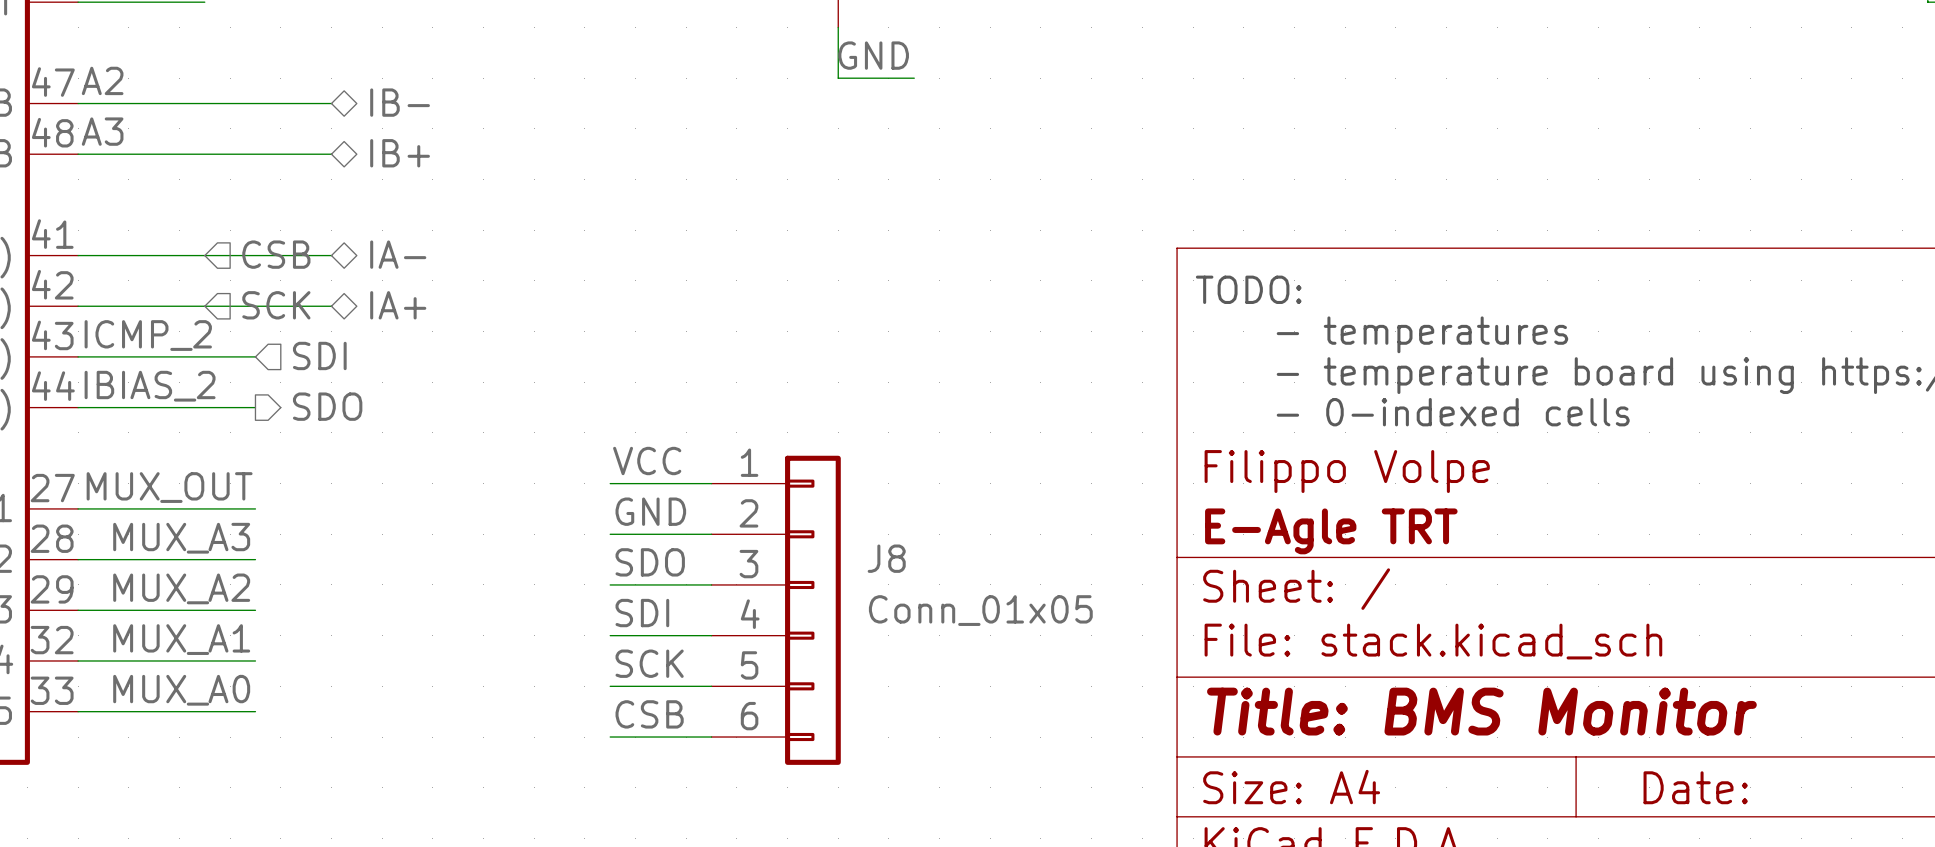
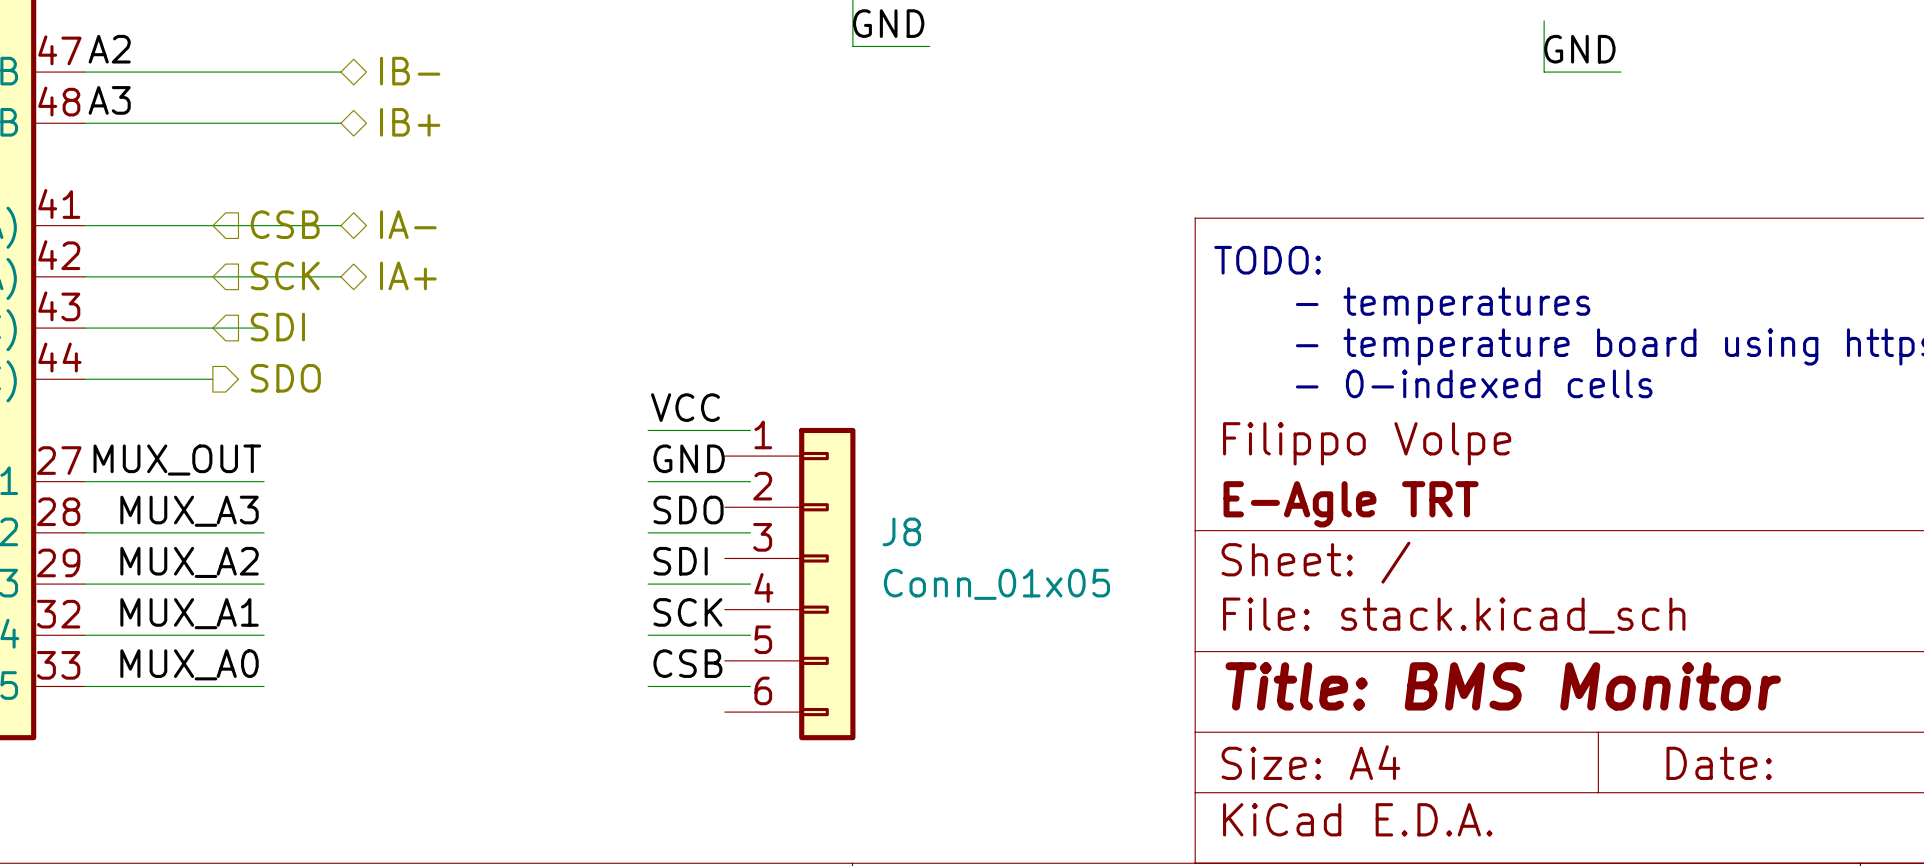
wire: none -> (1544, 20) (1544, 72) (1620, 72)
label: none -> GND (1579, 49)
label: ICMP_2 (148, 335) -> none
hierarchical label position: SDI (319, 355) -> SDI (277, 327)
label: IBIAS_2 (150, 386) -> none
hierarchical label position: SDO (327, 406) -> SDO (285, 378)
wire: (204, 407) (255, 407) -> none
label position: VCC (647, 461) -> VCC (685, 407)
wire: (610, 483) (711, 483) -> (648, 430) (750, 430)
label position: GND (650, 511) -> GND (689, 458)
wire: (610, 534) (711, 534) -> (648, 481) (750, 481)
label position: SDO (650, 562) -> SDO (688, 510)
wire: (610, 584) (711, 584) -> (648, 532) (750, 532)
label position: SDI (642, 613) -> SDI (680, 561)
wire: (610, 635) (711, 635) -> (648, 584) (750, 584)
label position: SCK (649, 663) -> SCK (687, 612)
wire: (610, 686) (711, 686) -> (648, 635) (750, 635)
label position: CSB (649, 714) -> CSB (687, 663)
wire: (610, 737) (711, 737) -> (648, 686) (750, 686)

